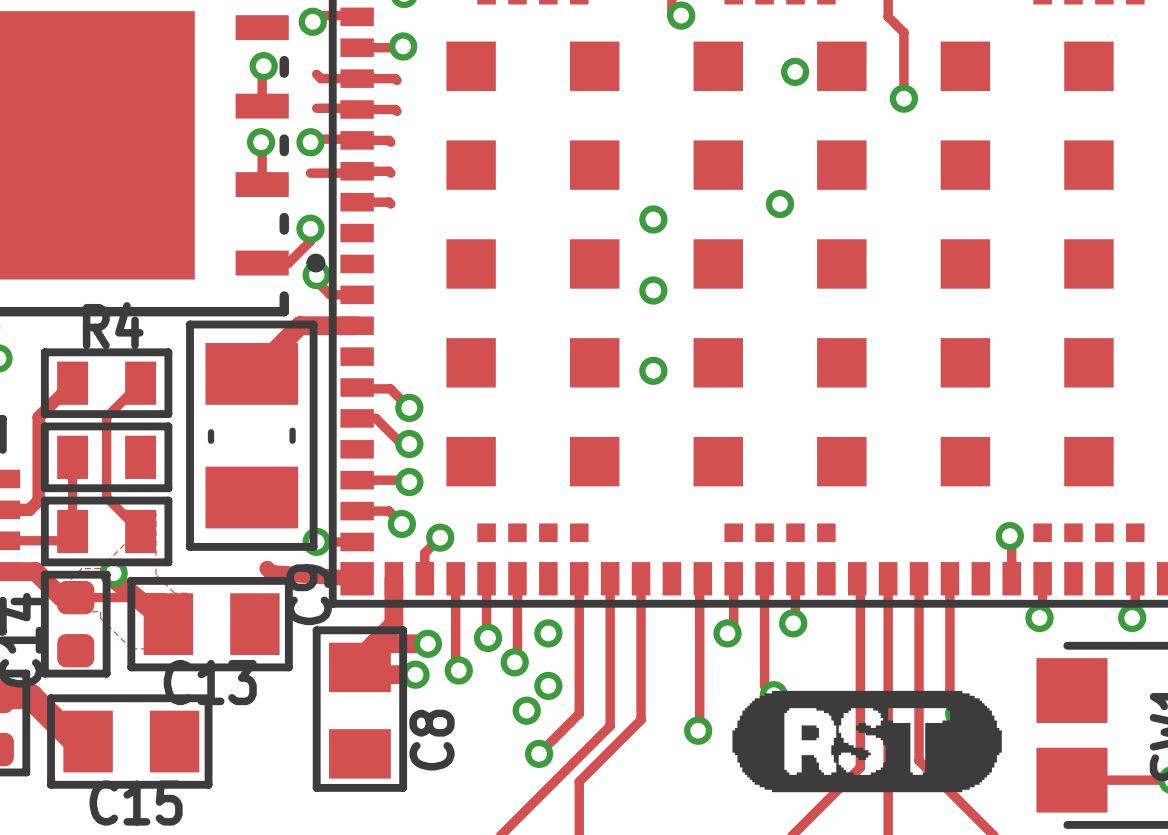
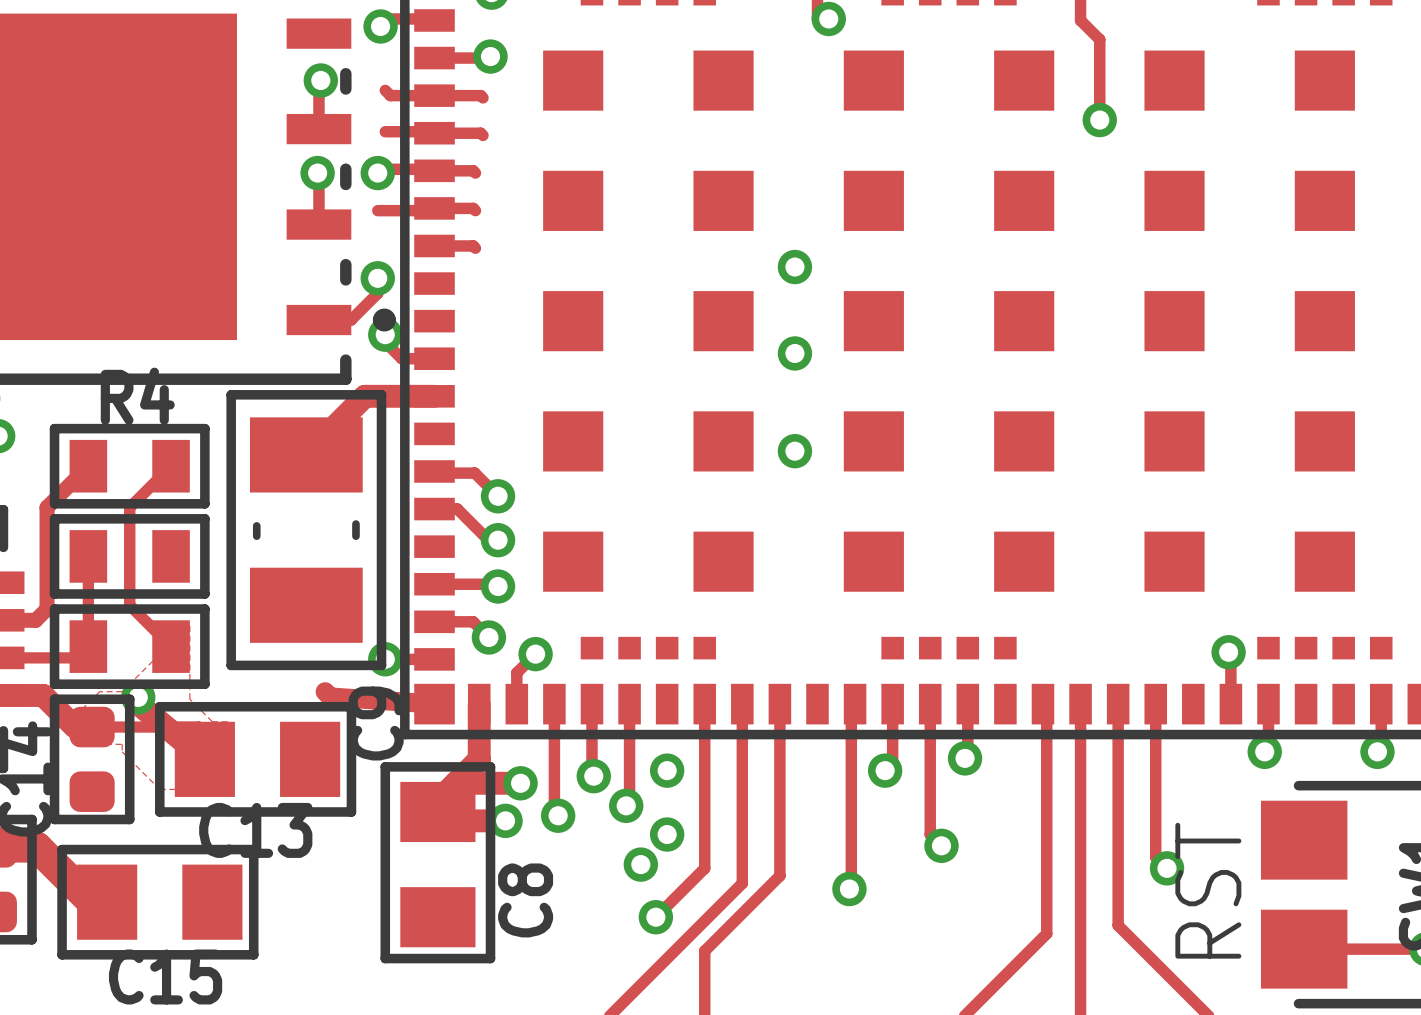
via: (795, 71) -> none
via: (780, 204) -> none
drawing: [732, 690, 1002, 793] -> none
text: none -> RST (1208, 890)

